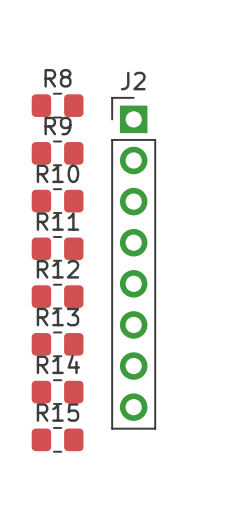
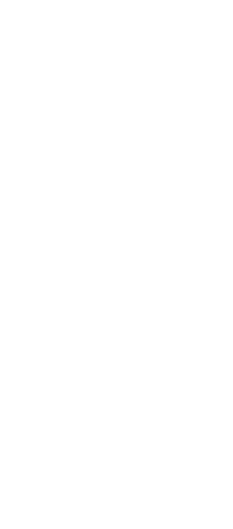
R8: (57, 105) -> none
R9: (57, 153) -> none
R10: (57, 201) -> none
R11: (57, 248) -> none
J2: (133, 263) -> none
R12: (57, 296) -> none
R13: (57, 344) -> none
R14: (57, 392) -> none
R15: (57, 439) -> none

